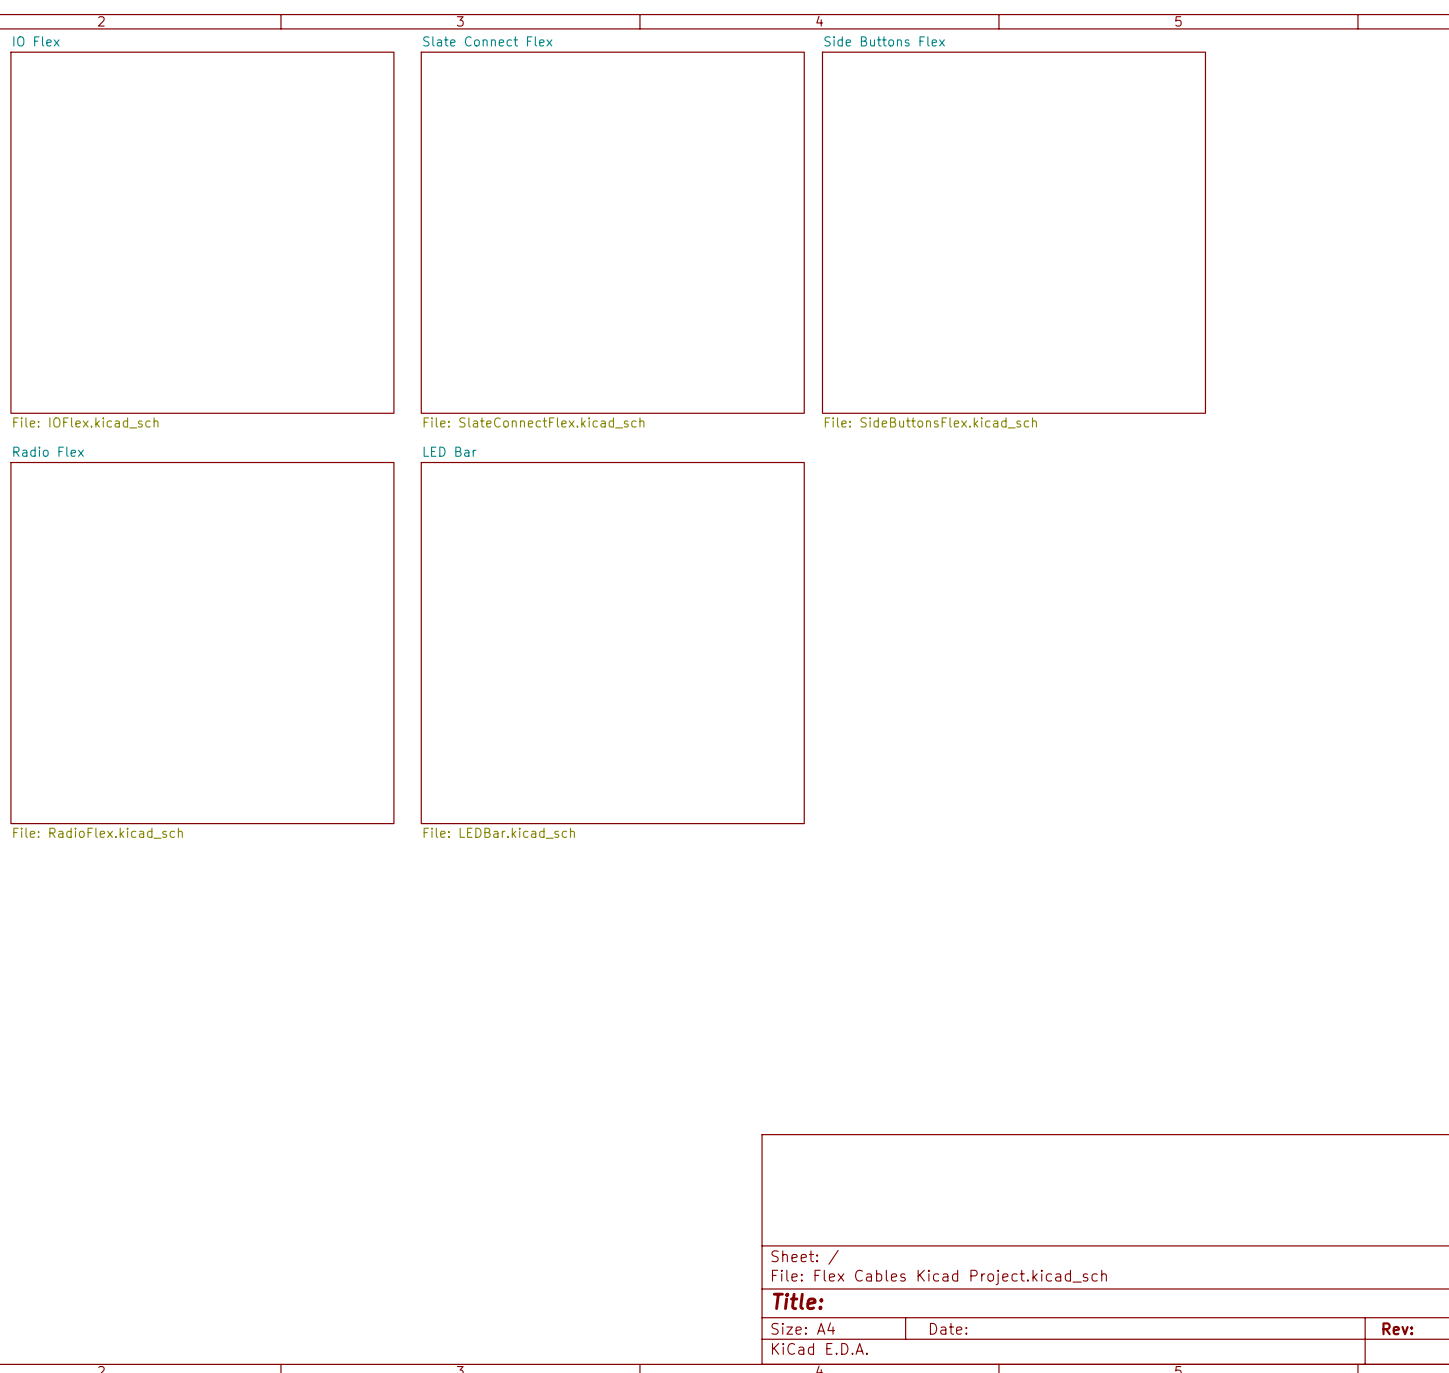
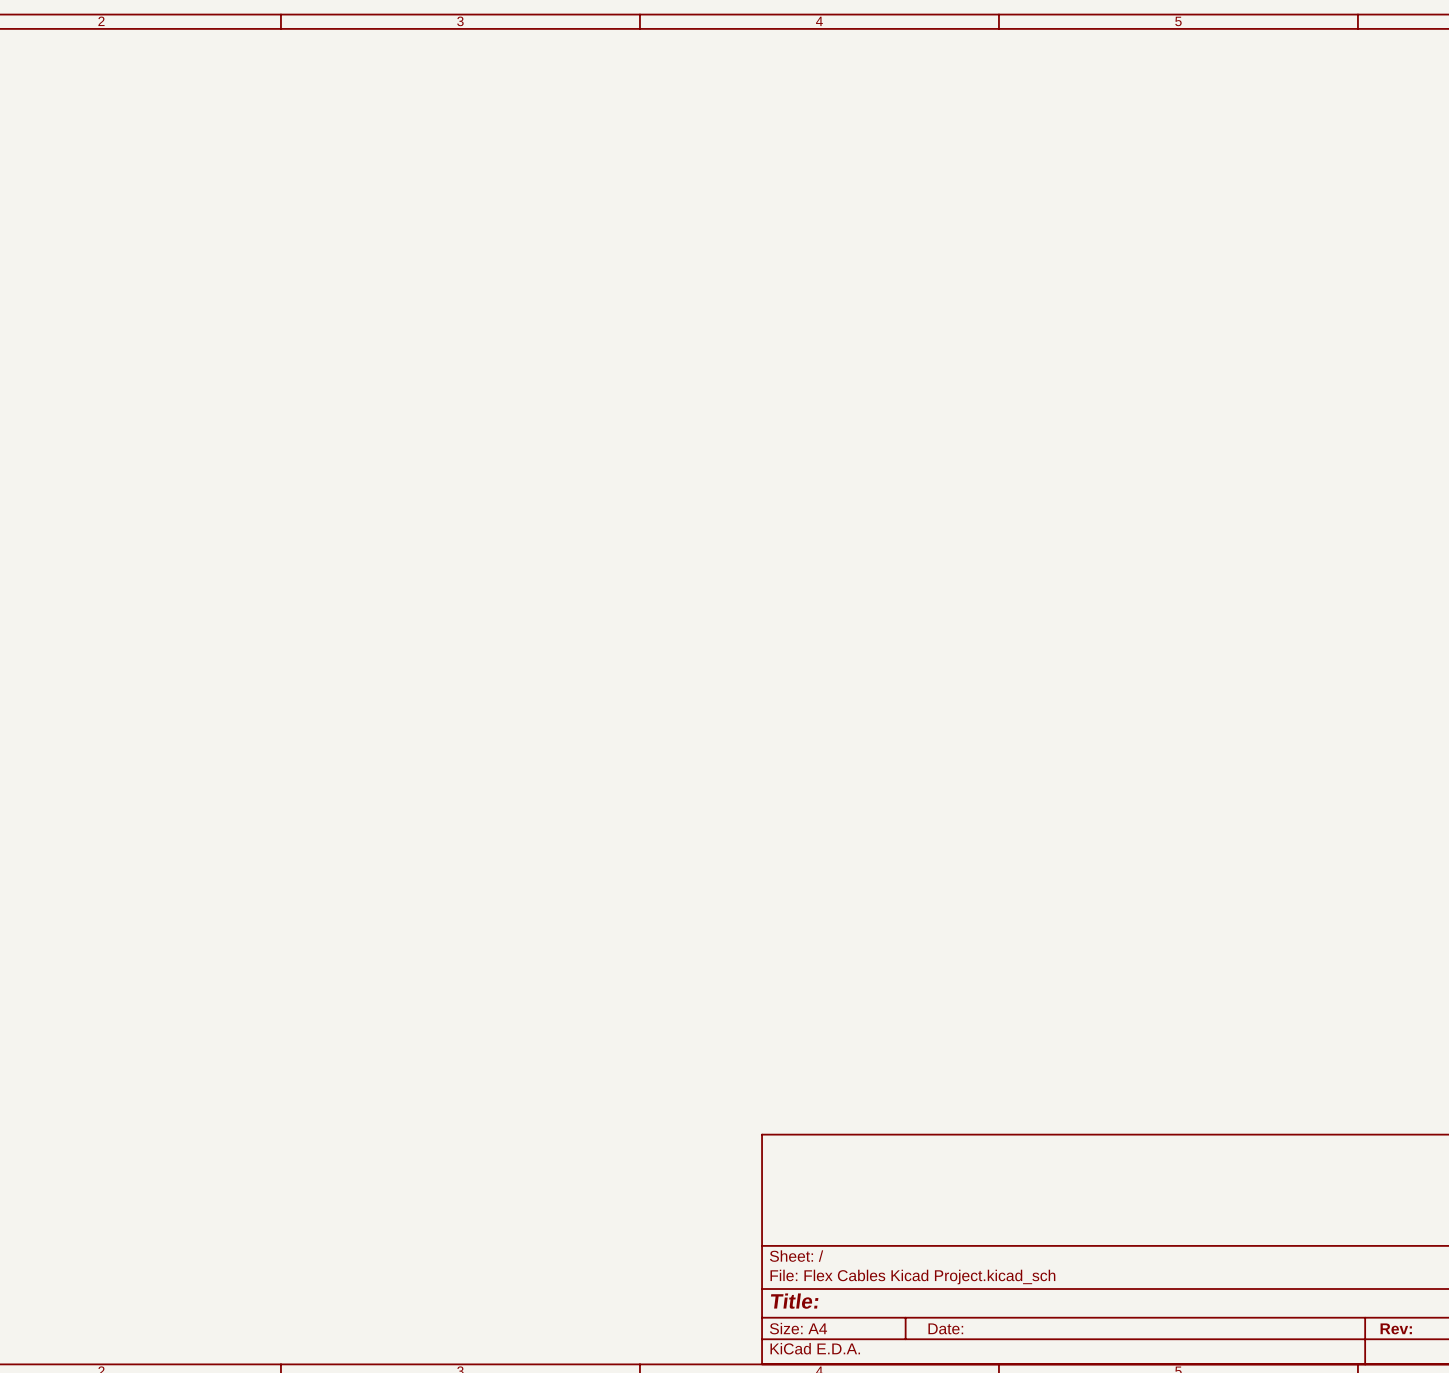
sheet IO Flex: File: IOFlex.kicad_sch (202, 232) -> none
sheet Slate Connect Flex: File: SlateConnectFlex.kicad_sch (612, 232) -> none
sheet Side Buttons Flex: File: SideButtonsFlex.kicad_sch (1013, 232) -> none
sheet Radio Flex: File: RadioFlex.kicad_sch (202, 643) -> none
sheet LED Bar: File: LEDBar.kicad_sch (612, 643) -> none

